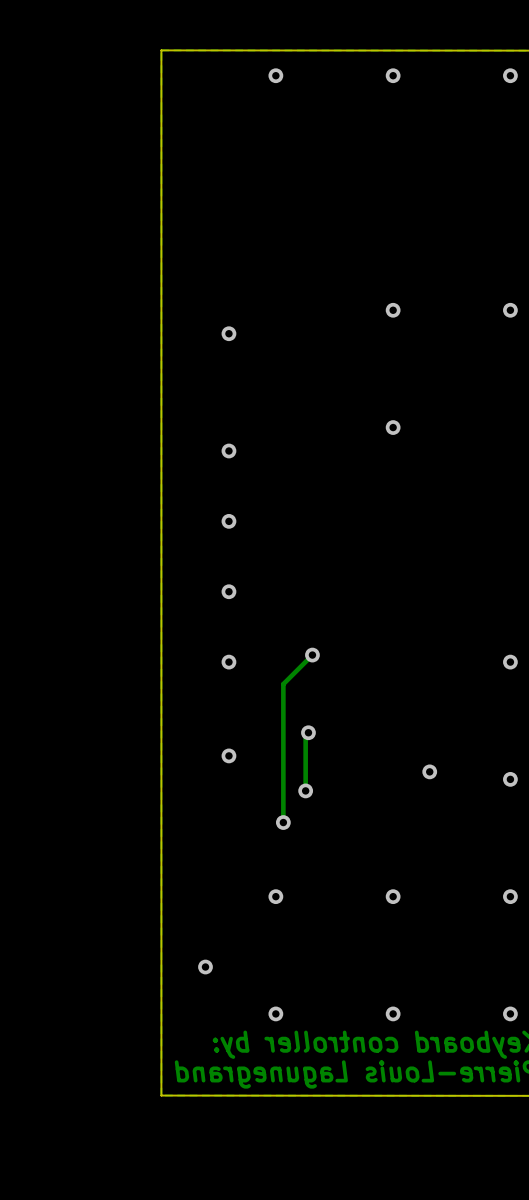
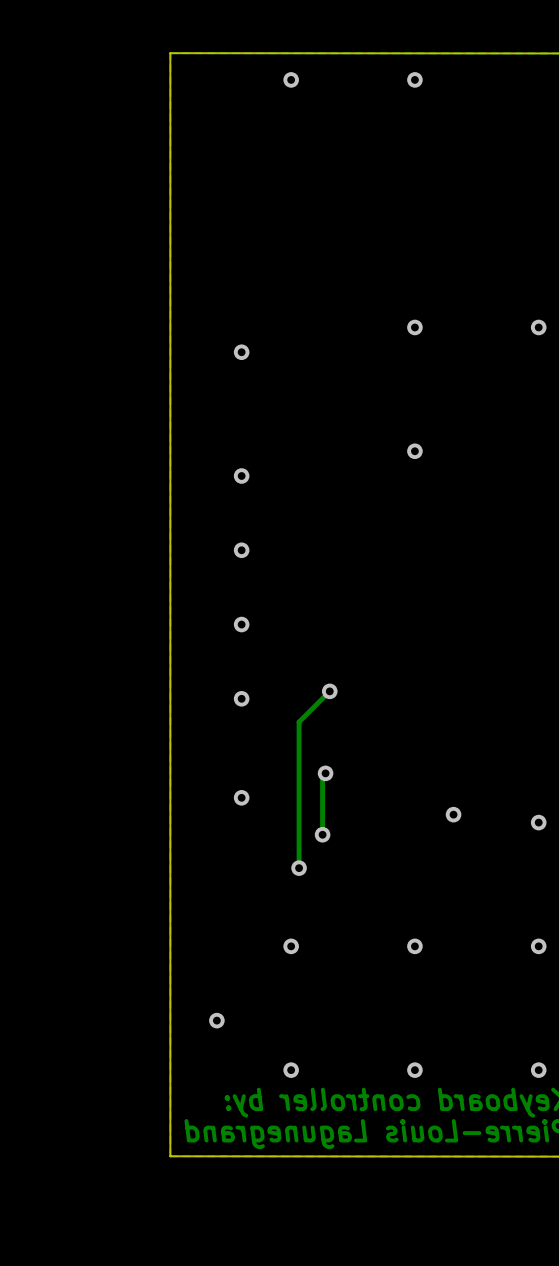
via: (510, 75) -> none
via: (510, 662) -> none

